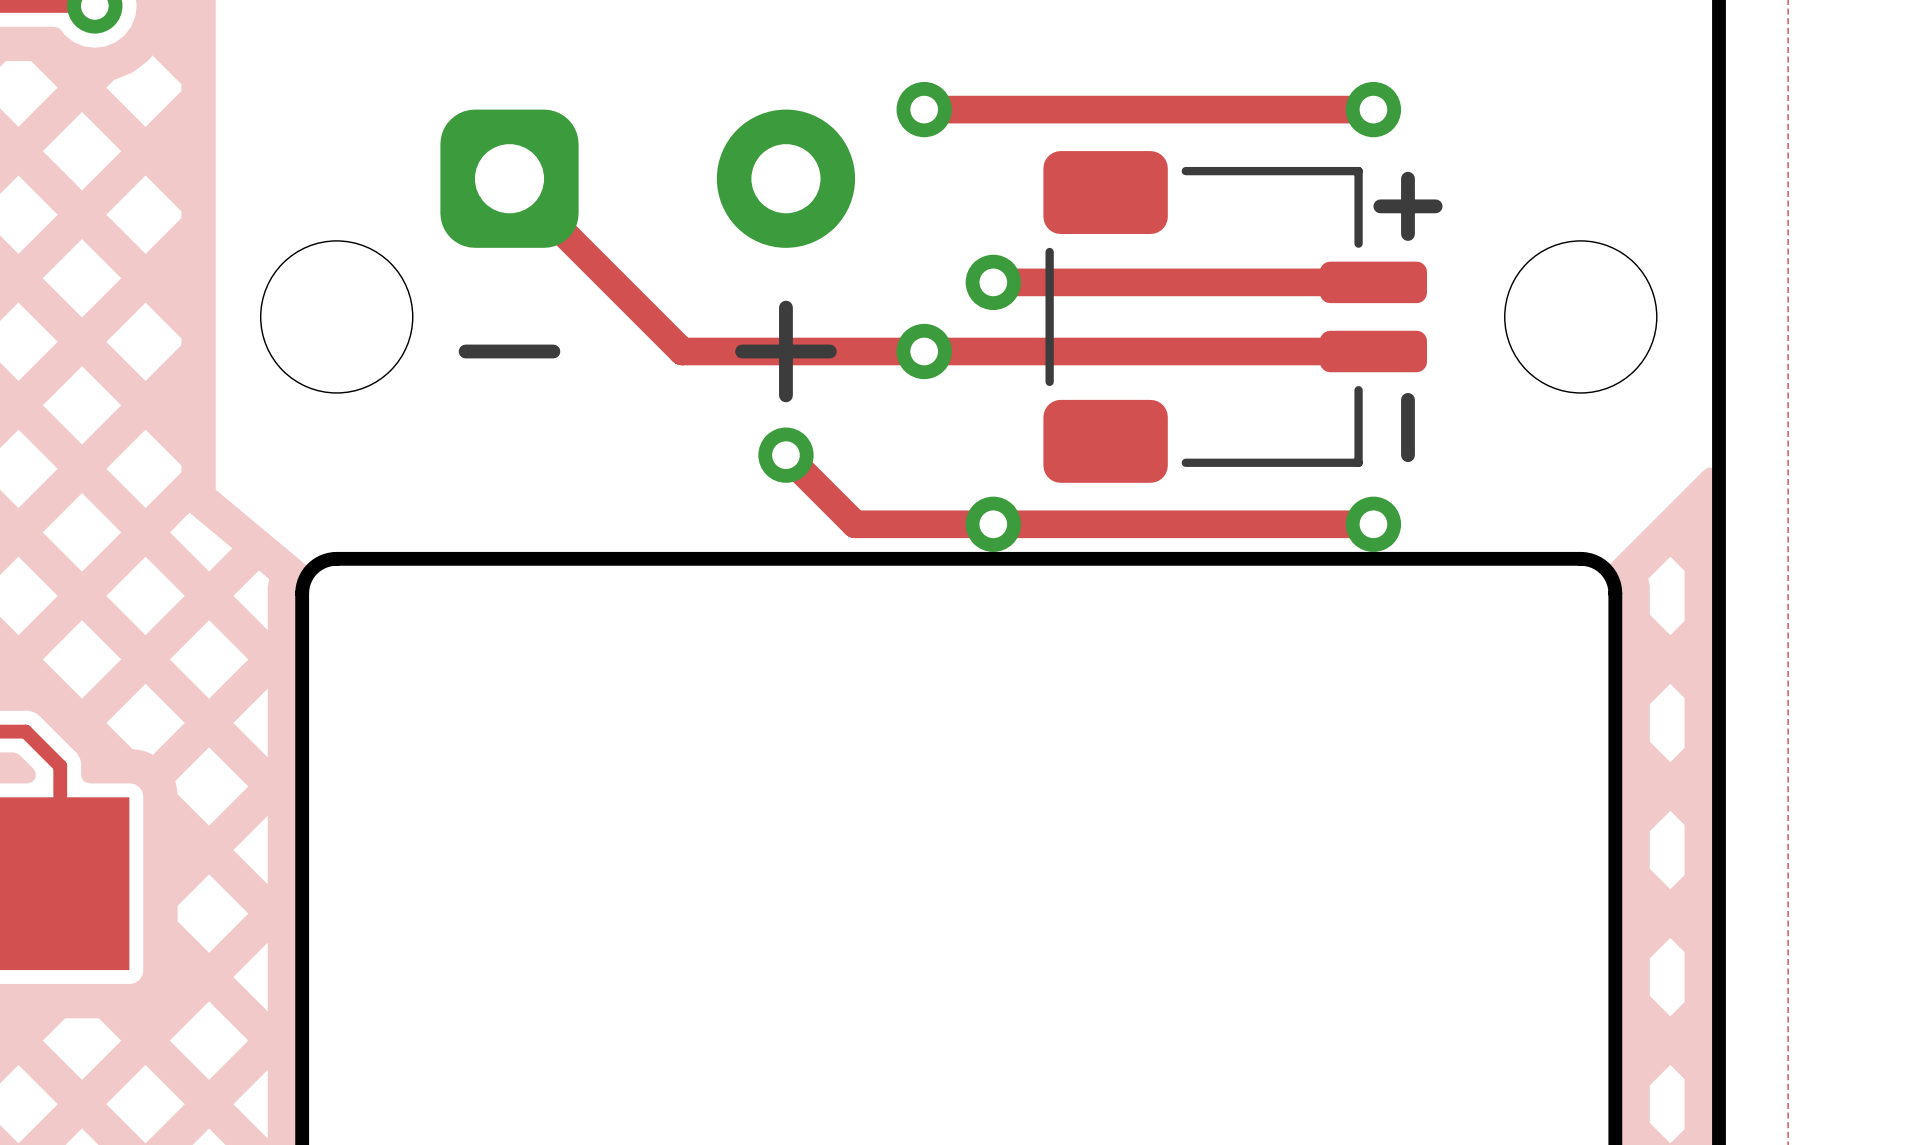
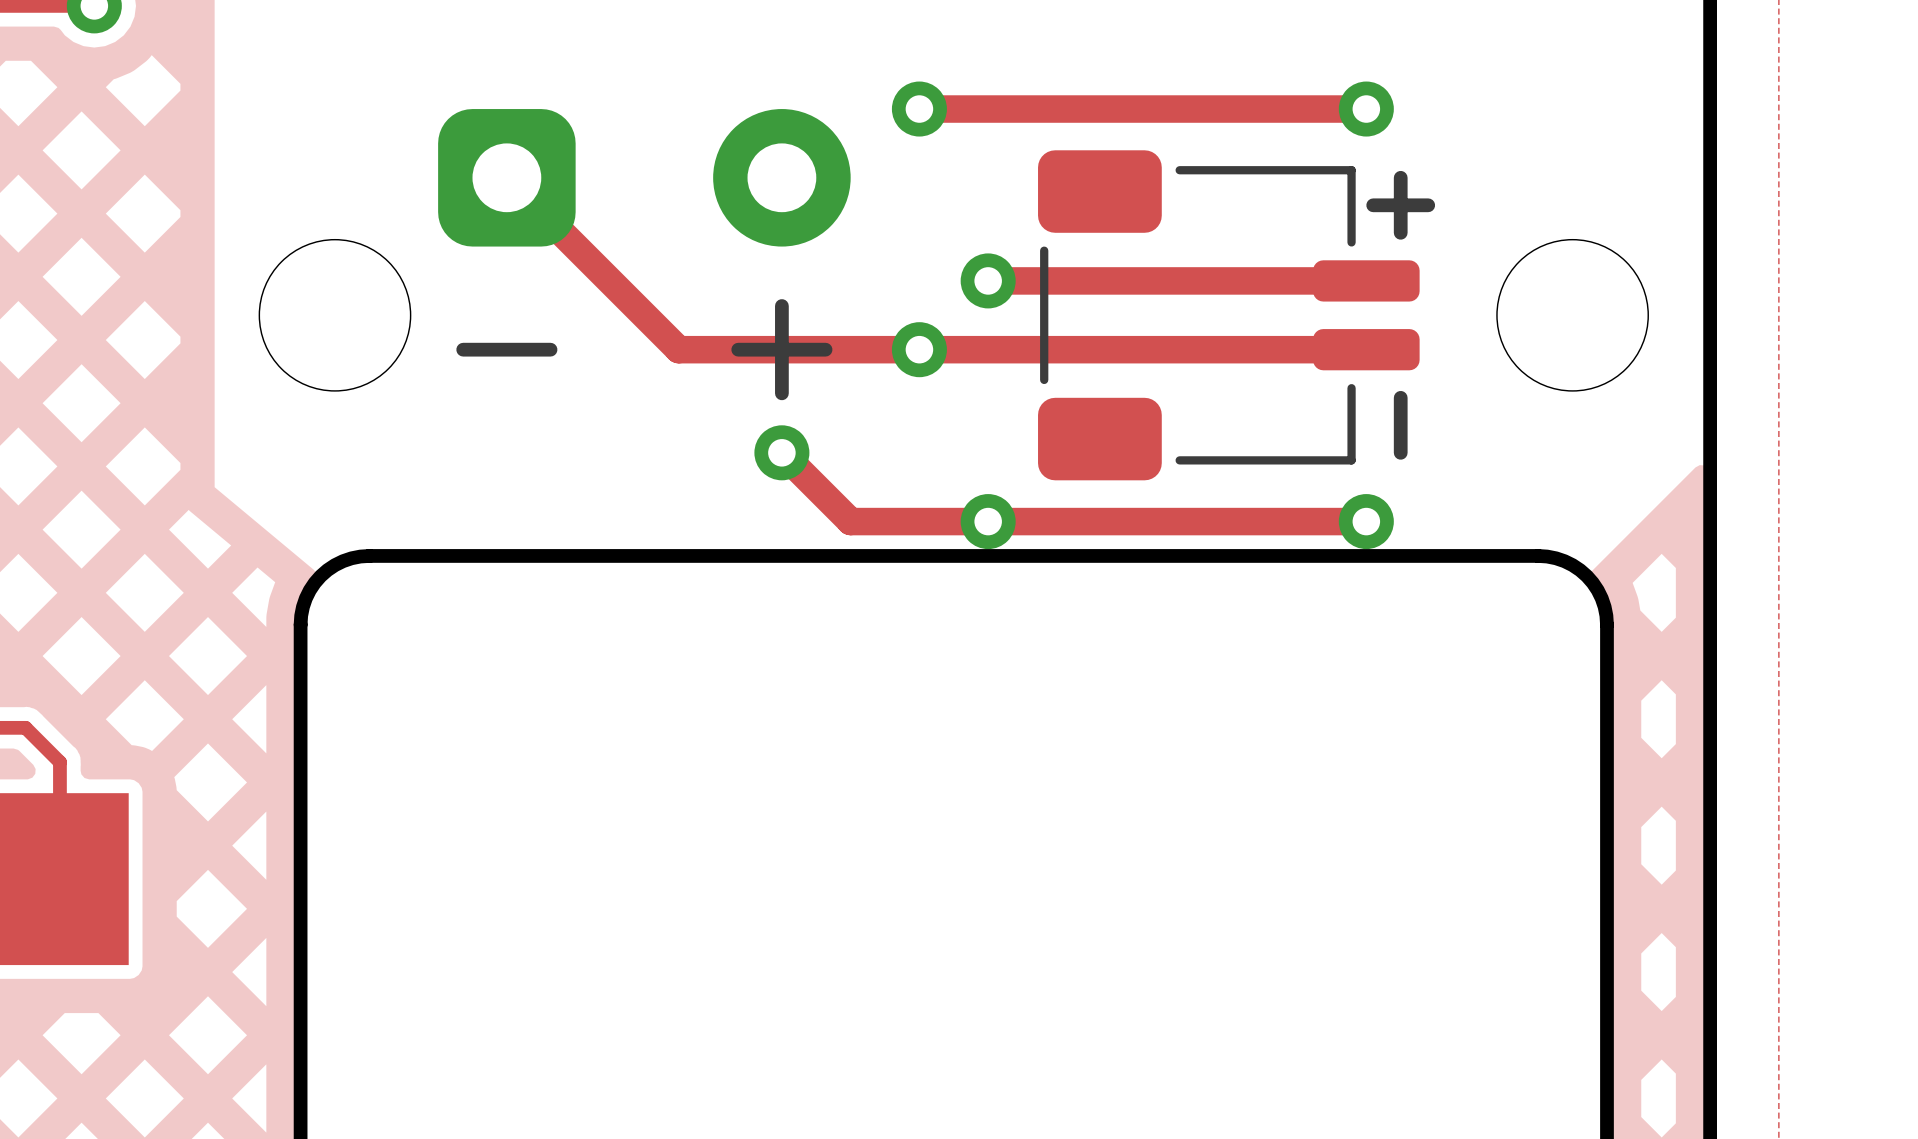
board edge: (371, 558) (329, 559) (312, 568) (303, 585) (302, 627) -> (369, 555) (343, 561) (320, 576) (305, 598) (300, 624)
board edge: (1546, 558) (1585, 559) (1598, 563) (1605, 568) (1612, 580) (1615, 588) (1615, 627) -> (1538, 555) (1564, 561) (1586, 576) (1601, 598) (1606, 624)

